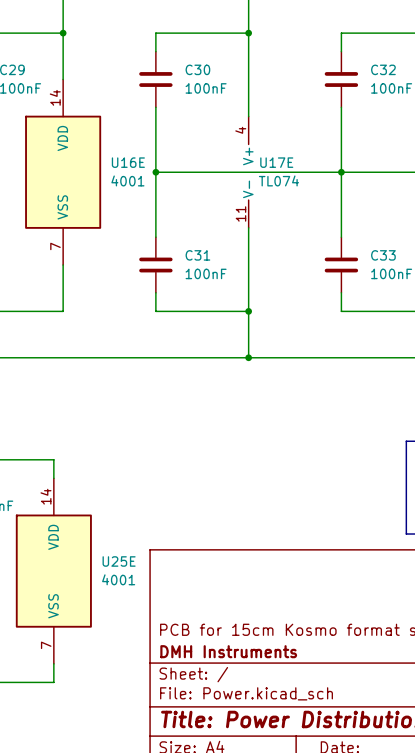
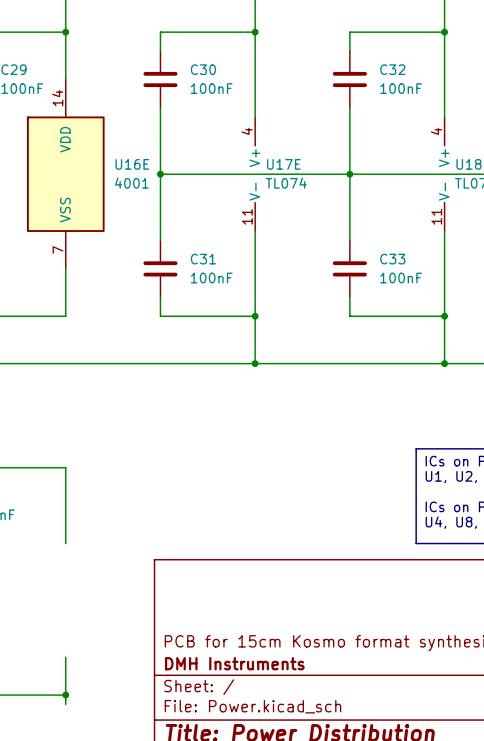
wire: (53, 459) (53, 478) -> (56, 467) (65, 467) (65, 543)
U25E: 4001 (53, 571) -> none
wire: none -> (65, 657) (65, 704)
wire: (53, 663) (53, 682) -> (65, 695) (56, 695)
junction: none -> (65, 695)

